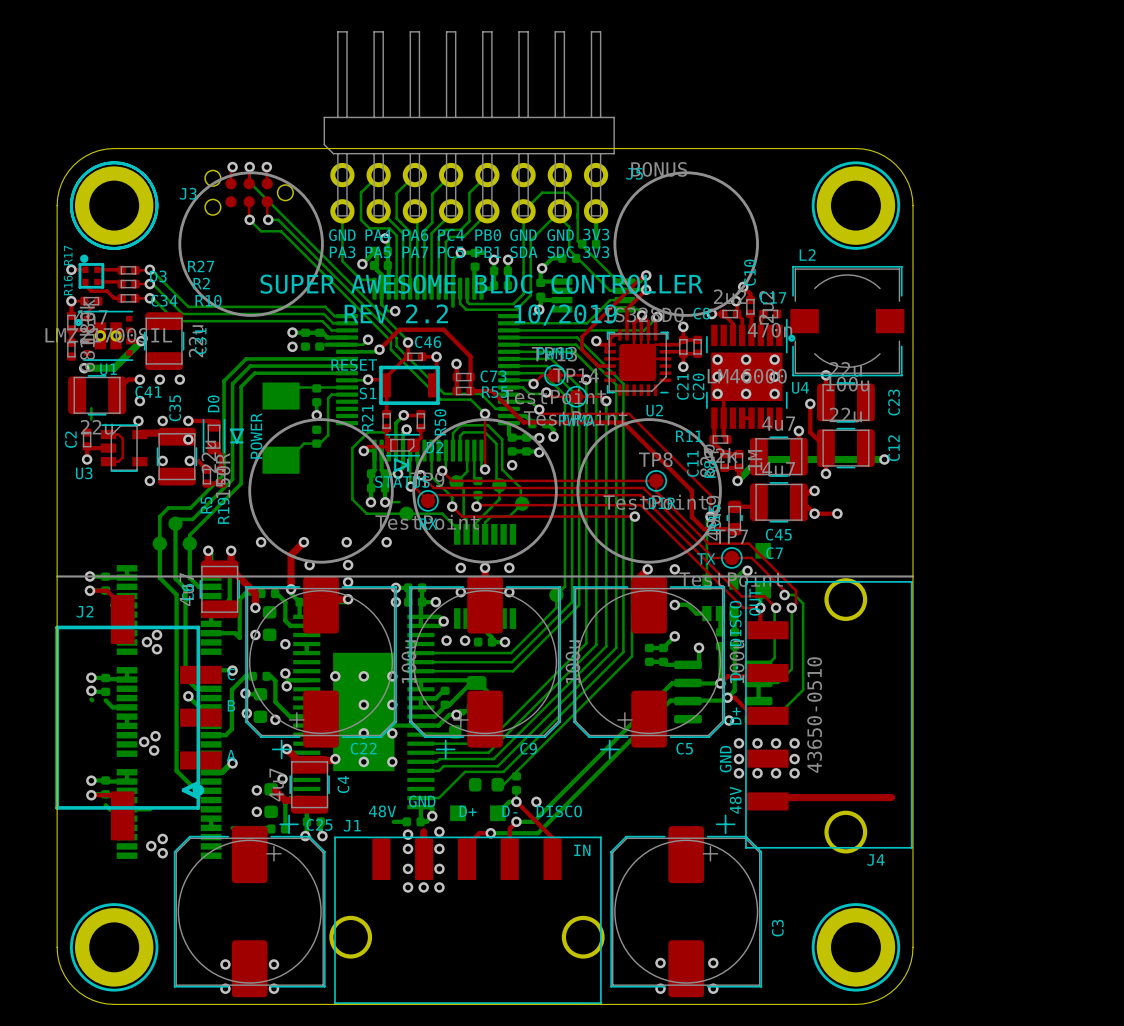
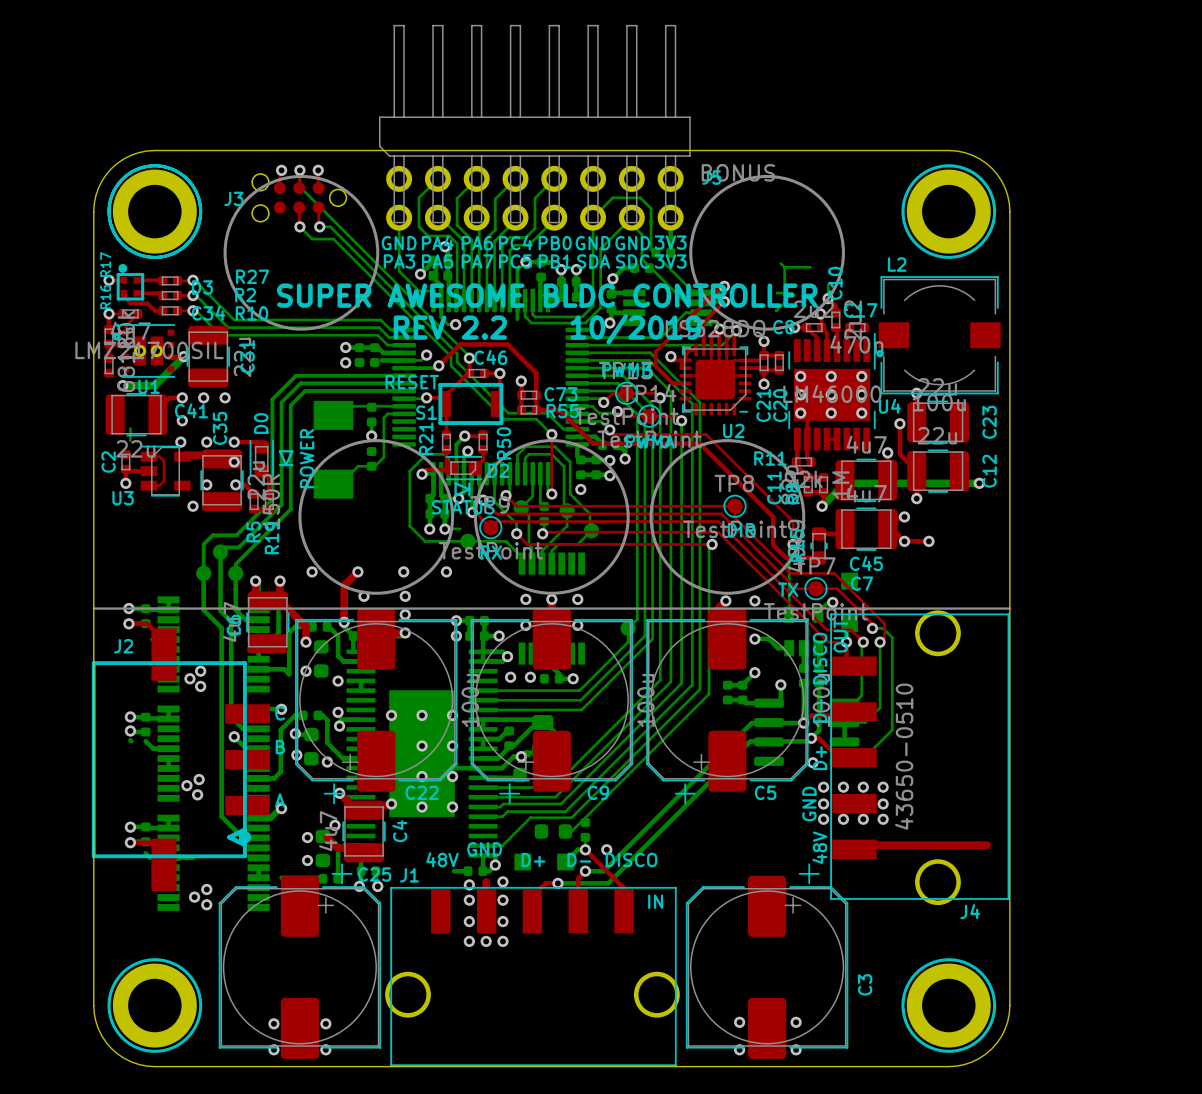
bottom track: none -> (780, 263) (784, 267)
bottom track: none -> (784, 267) (784, 302) (776, 310)
bottom track: none -> (784, 267) (810, 267)
bottom track: none -> (828, 284) (828, 298)
bottom track: none -> (777, 293) (792, 293)

